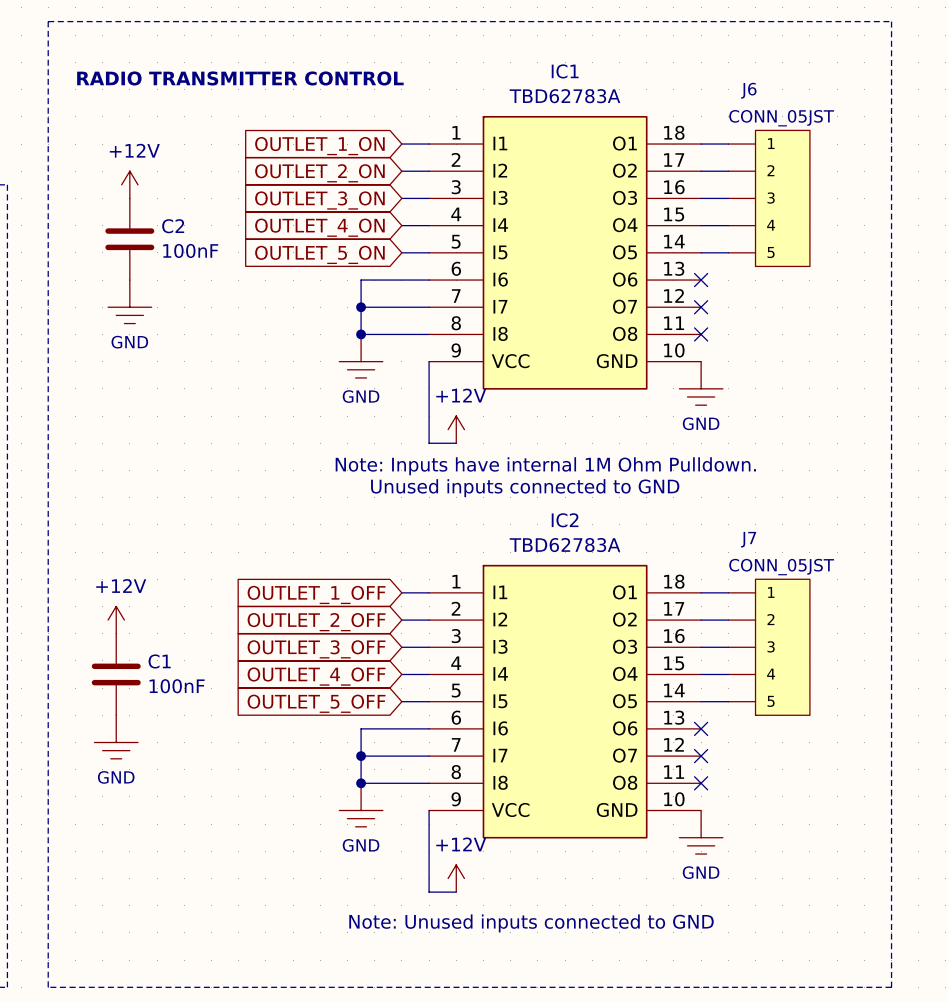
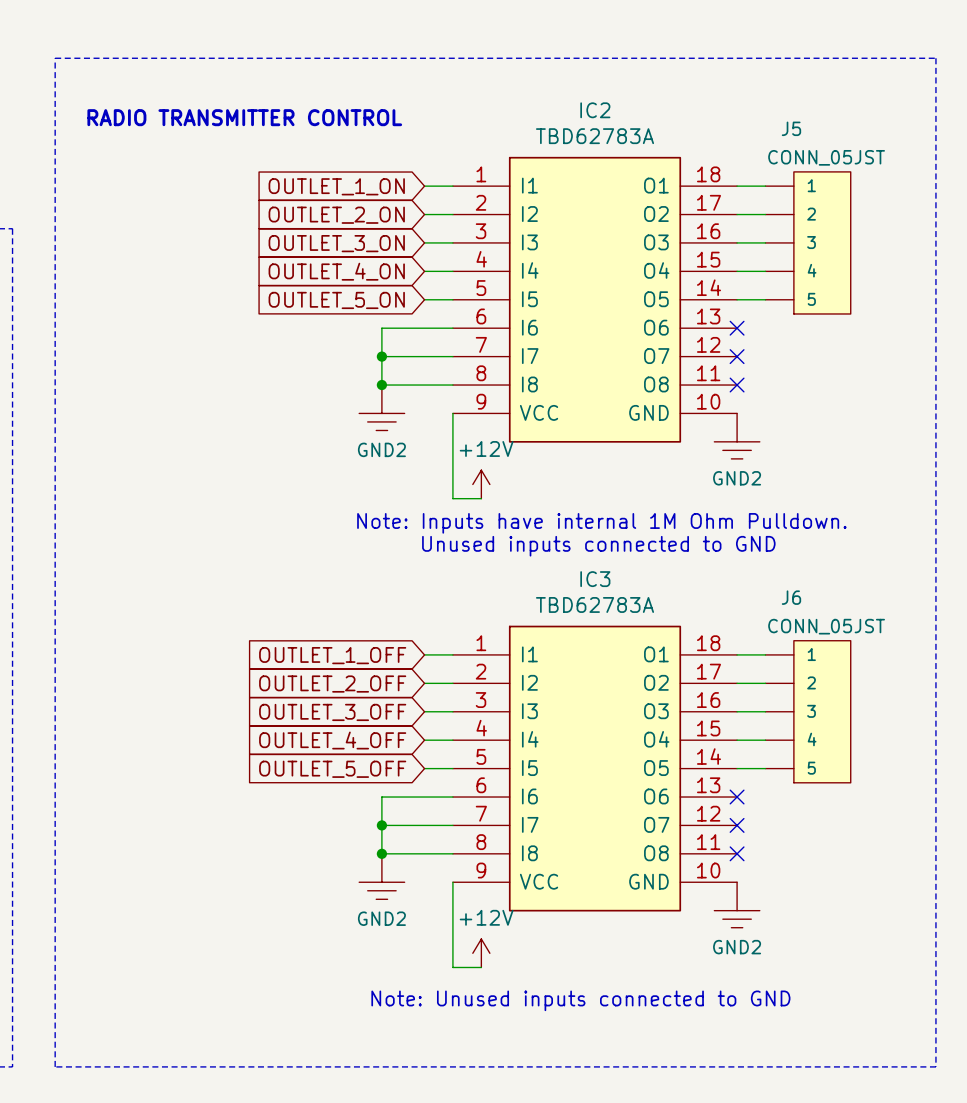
IC1 name: IC1 (565, 71) -> IC2 (595, 110)
J6 name: J6 (748, 90) -> J5 (791, 128)
power symbol: +12V (129, 184) -> none
C2: 100nF (129, 239) -> none
power symbol: GND (129, 301) -> none
power symbol: GND (361, 356) -> GND2 (381, 407)
power symbol: GND (701, 383) -> GND2 (737, 436)
IC2 name: IC2 (565, 520) -> IC3 (595, 579)
J7 name: J7 (748, 539) -> J6 (791, 597)
power symbol: +12V (116, 620) -> none
C1: 100nF (116, 674) -> none
power symbol: GND (116, 737) -> none
power symbol: GND (361, 805) -> GND2 (381, 876)
power symbol: GND (701, 832) -> GND2 (737, 904)

